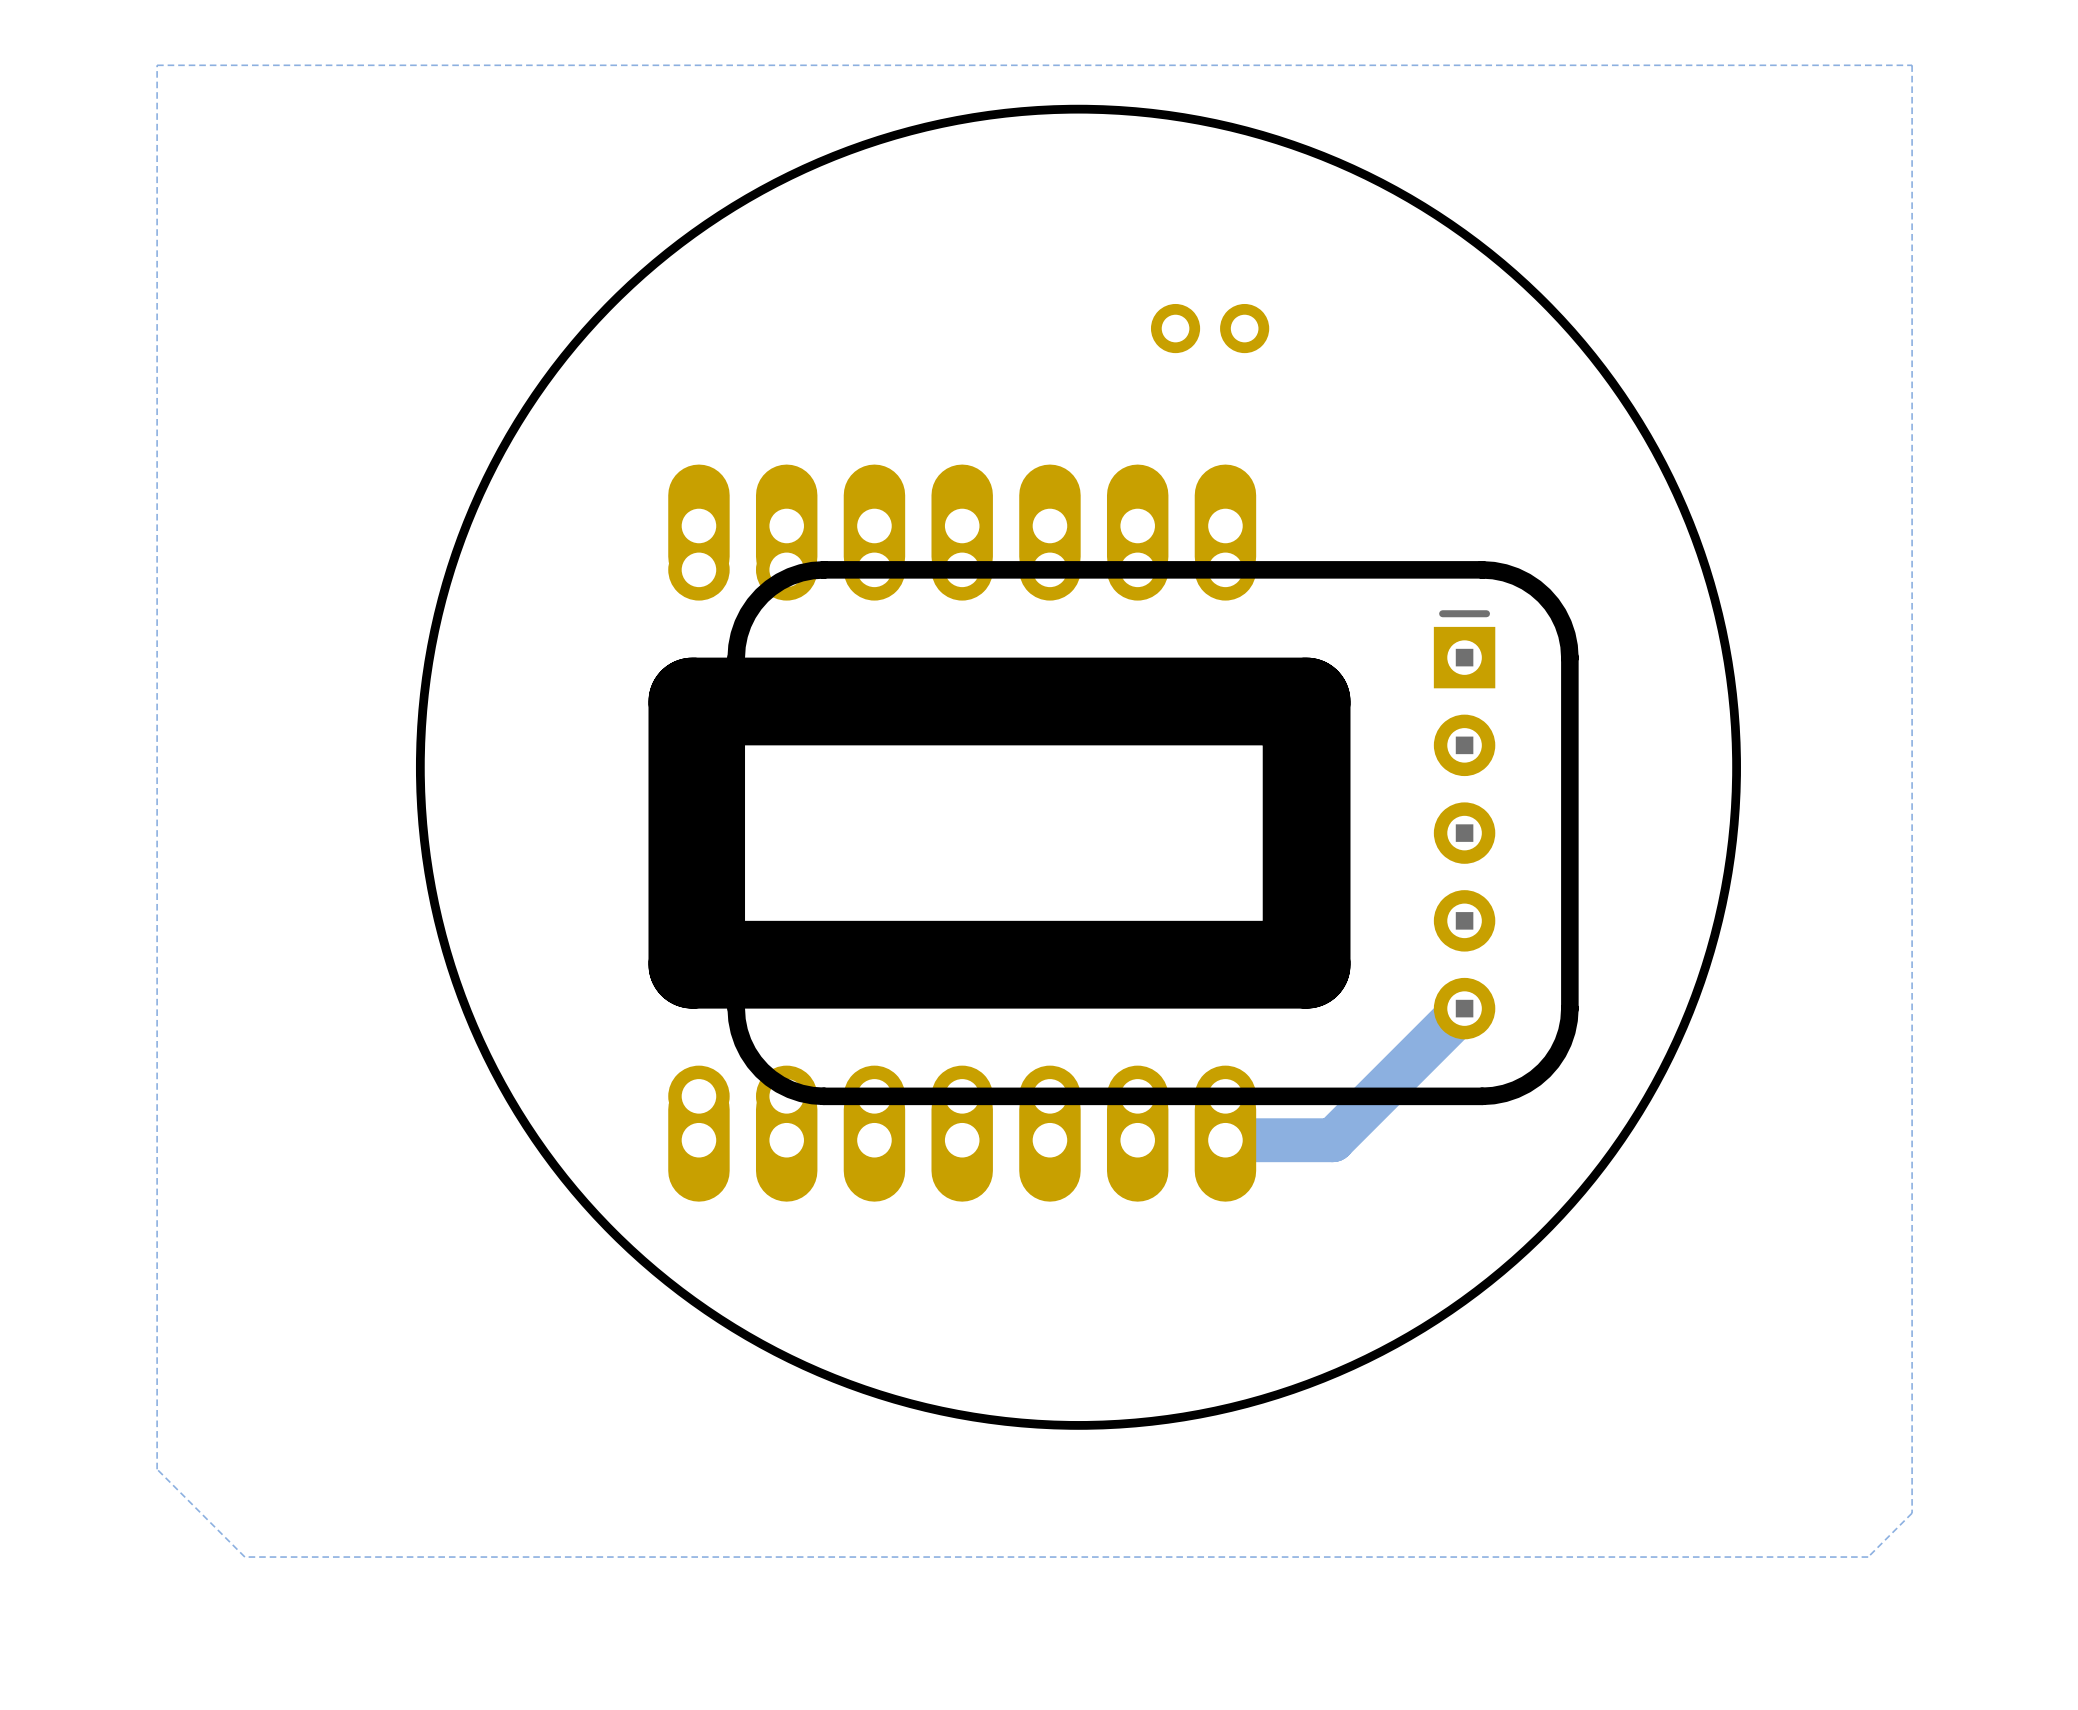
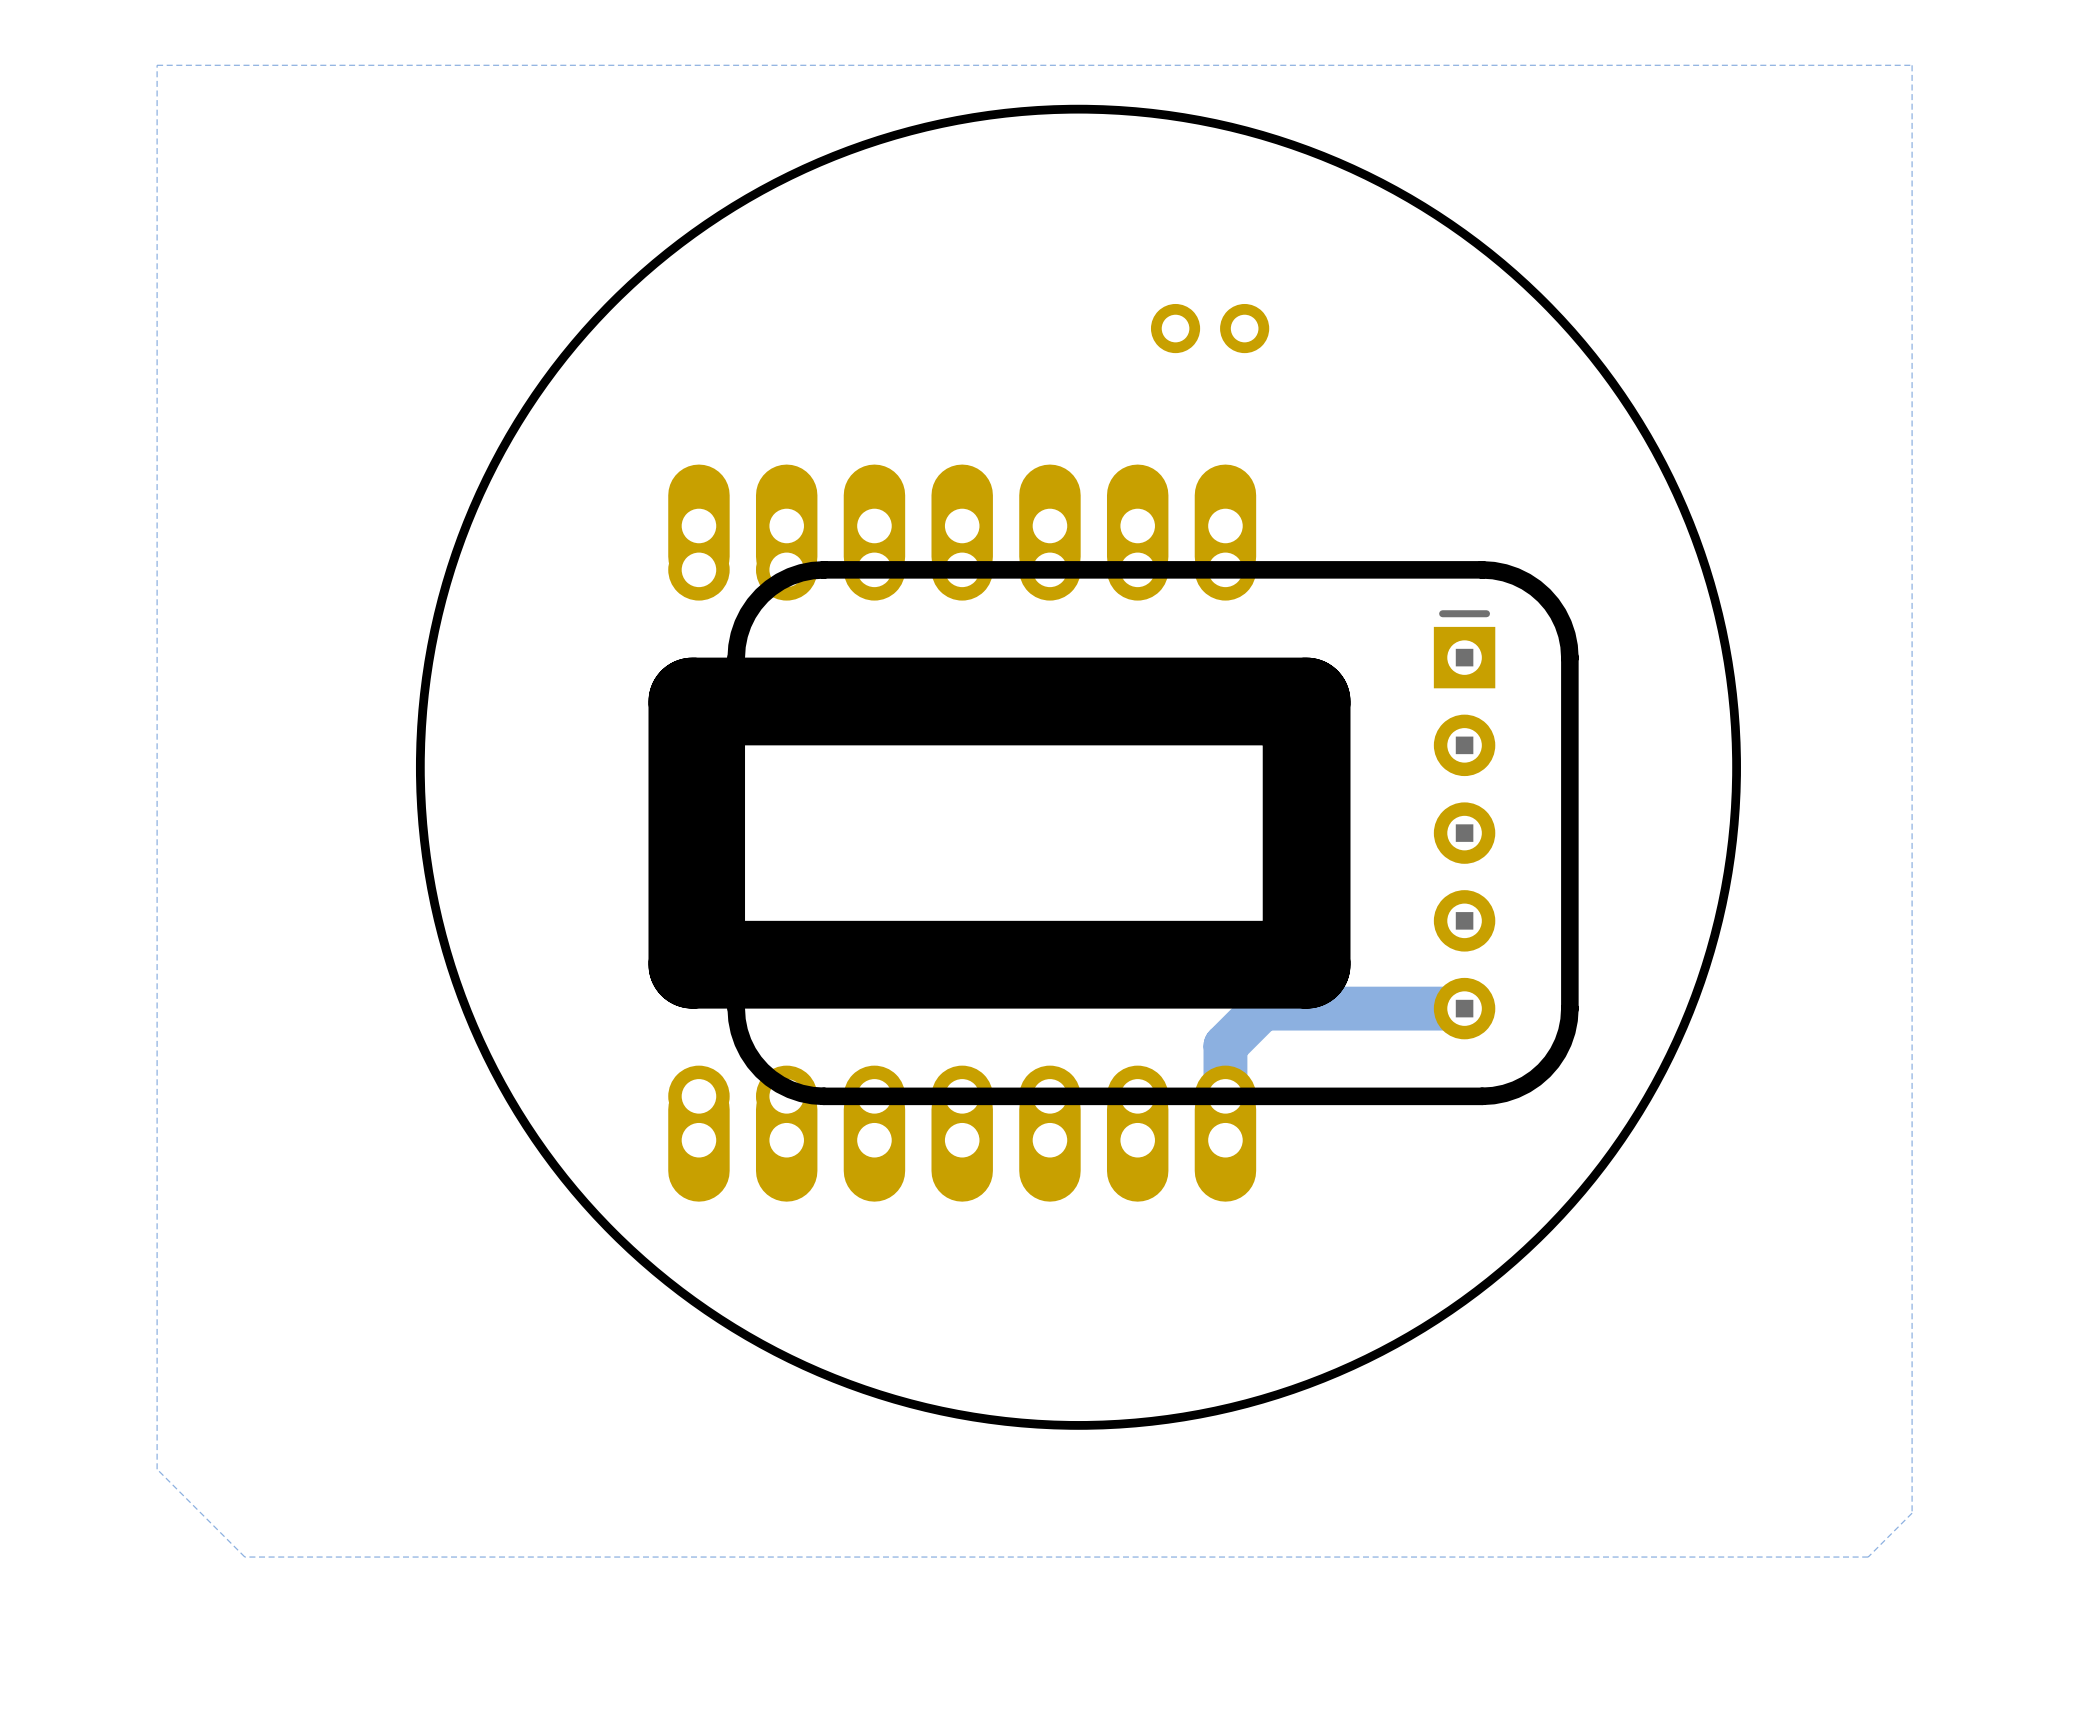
track: (1464, 1008) (1332, 1140) (1225, 1140) -> (1464, 1008) (1262, 1008) (1225, 1045) (1225, 1140)

